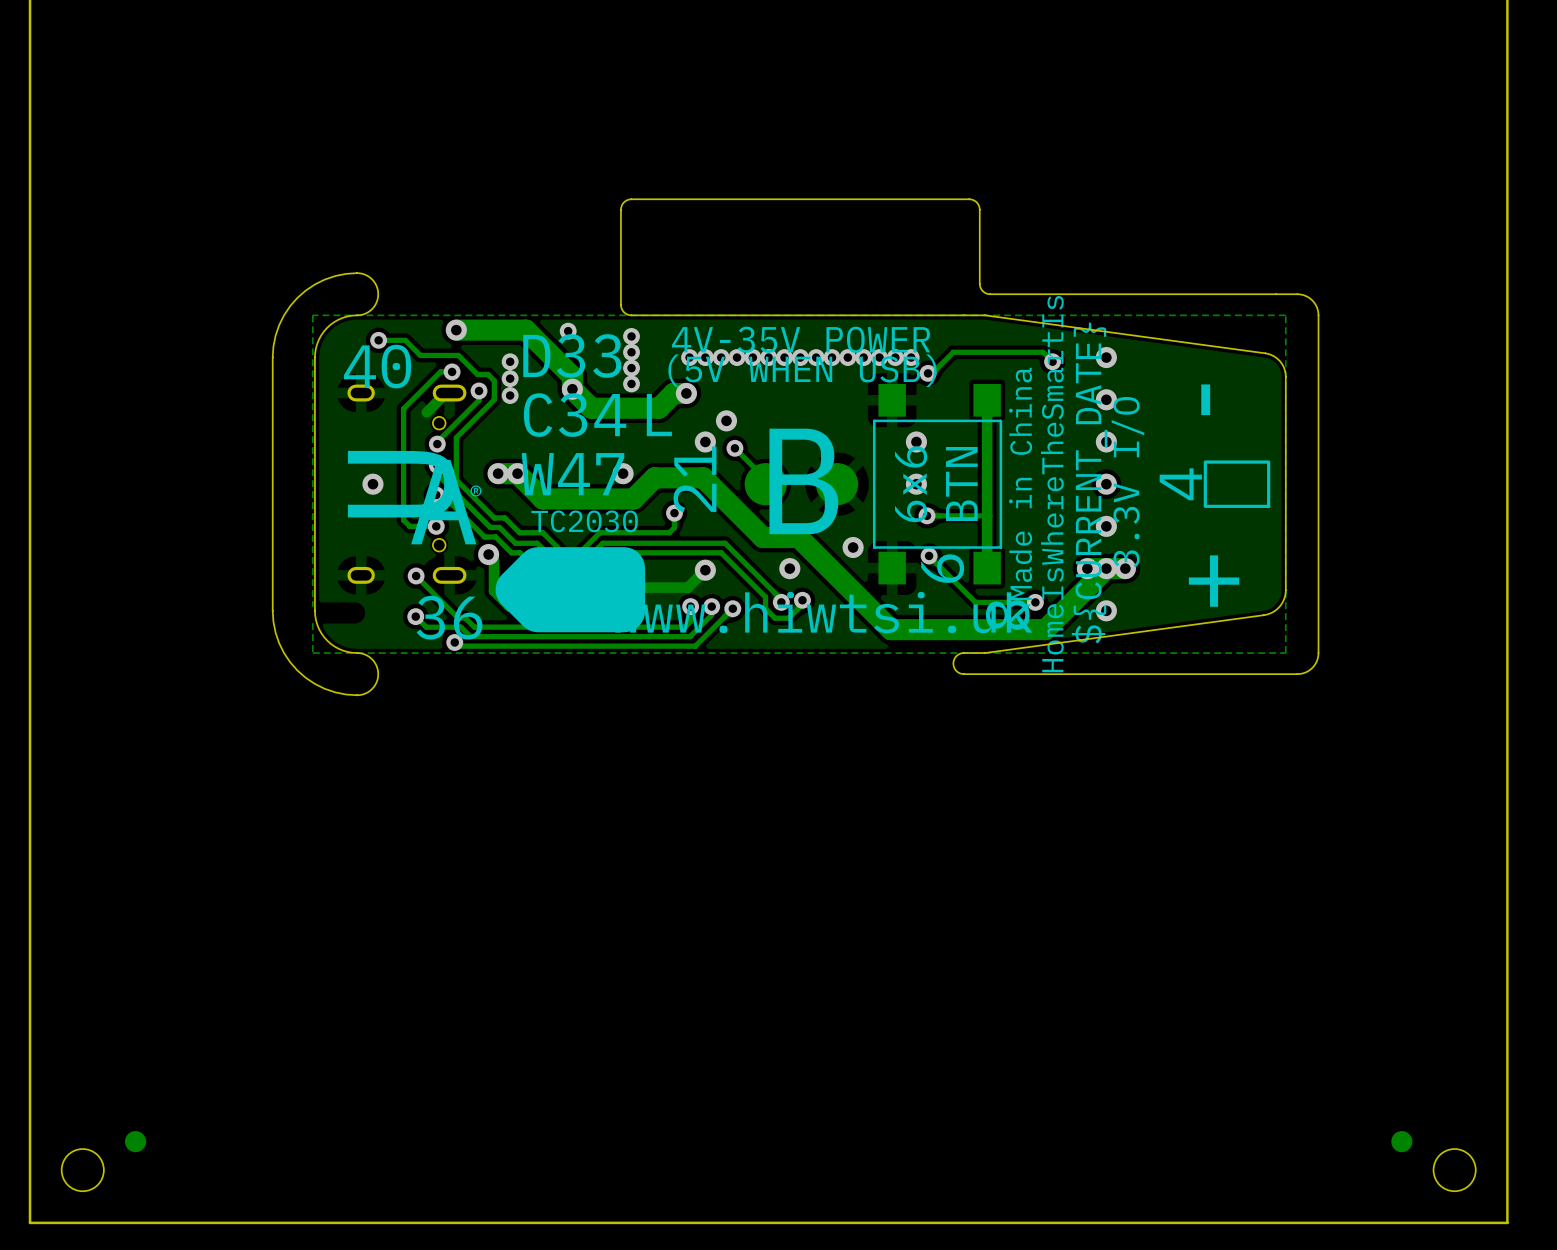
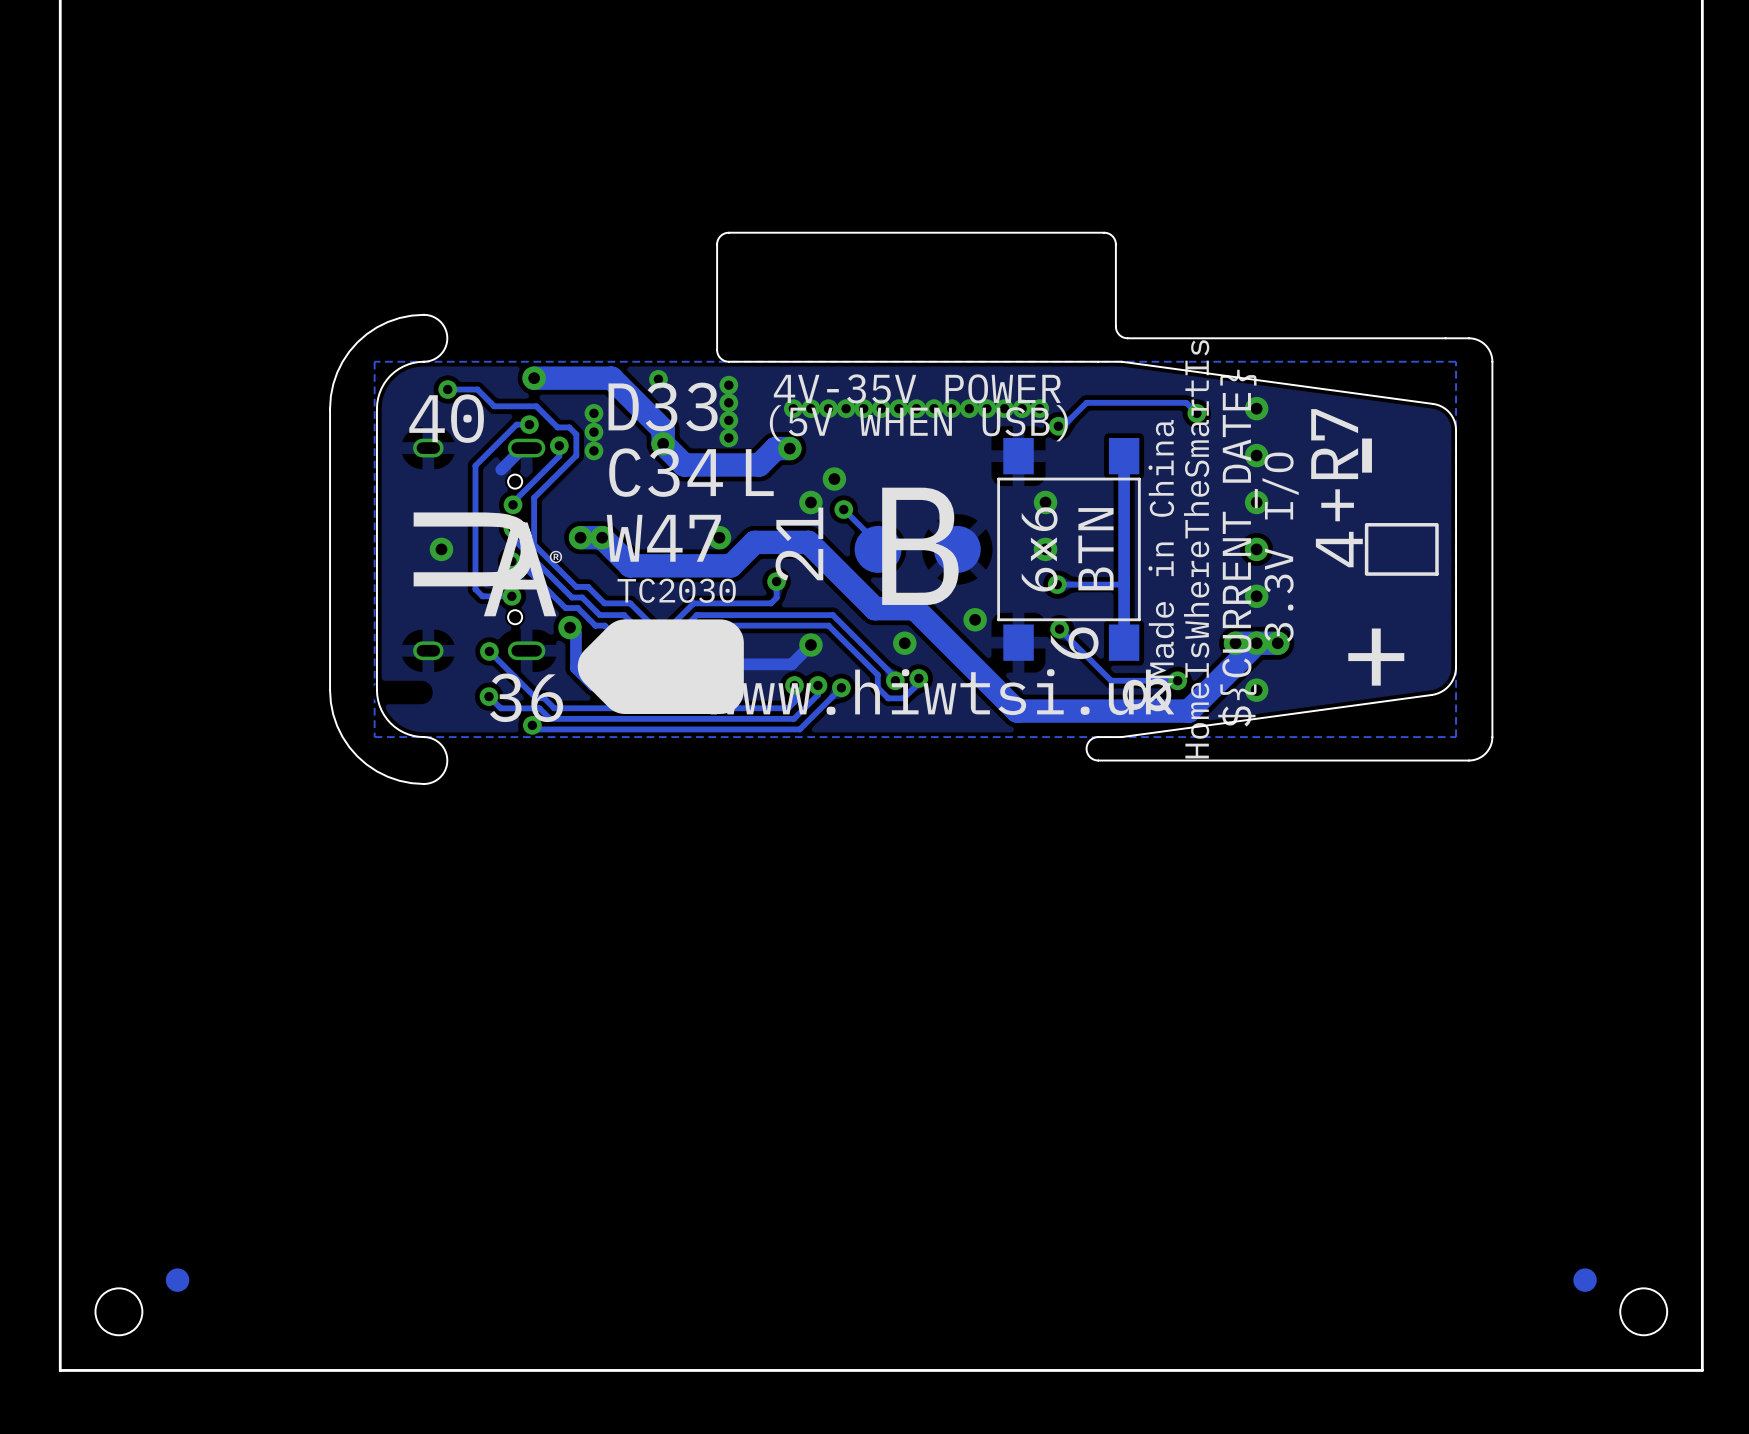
text: none -> +R7 (1334, 465)

